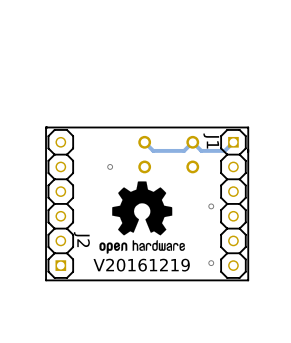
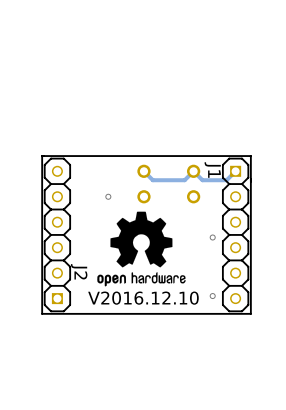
text: V20161219 (141, 265) -> V2016.12.10 (143, 298)

